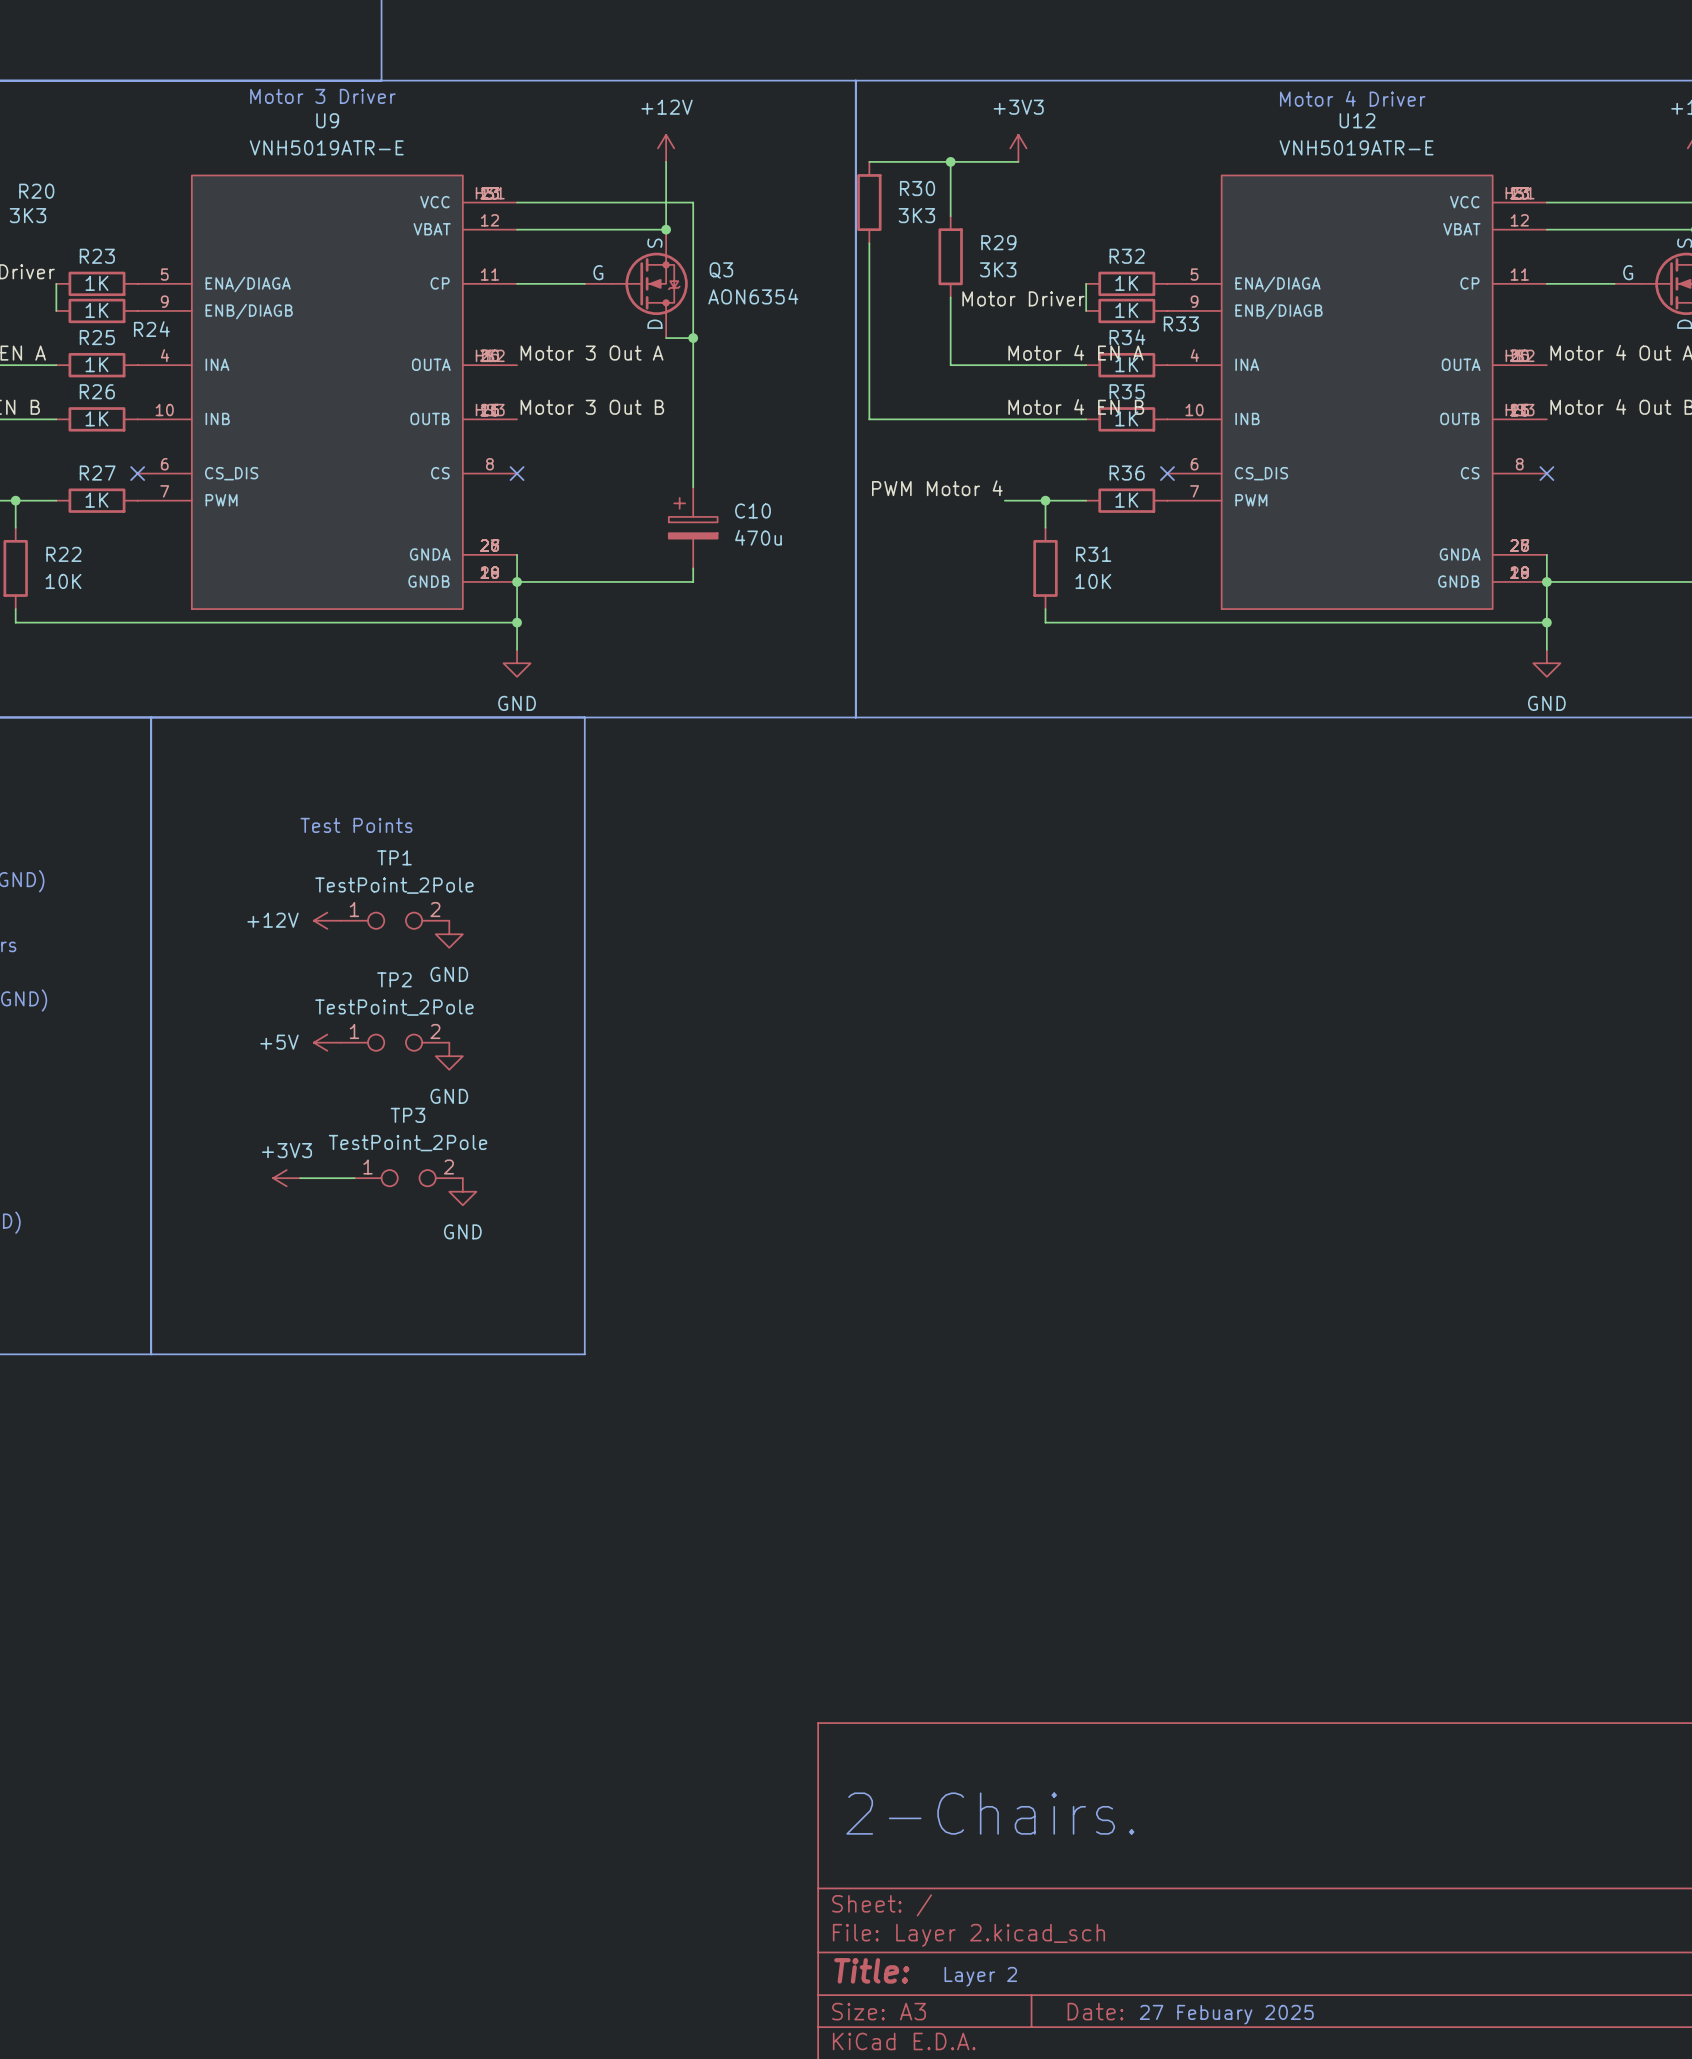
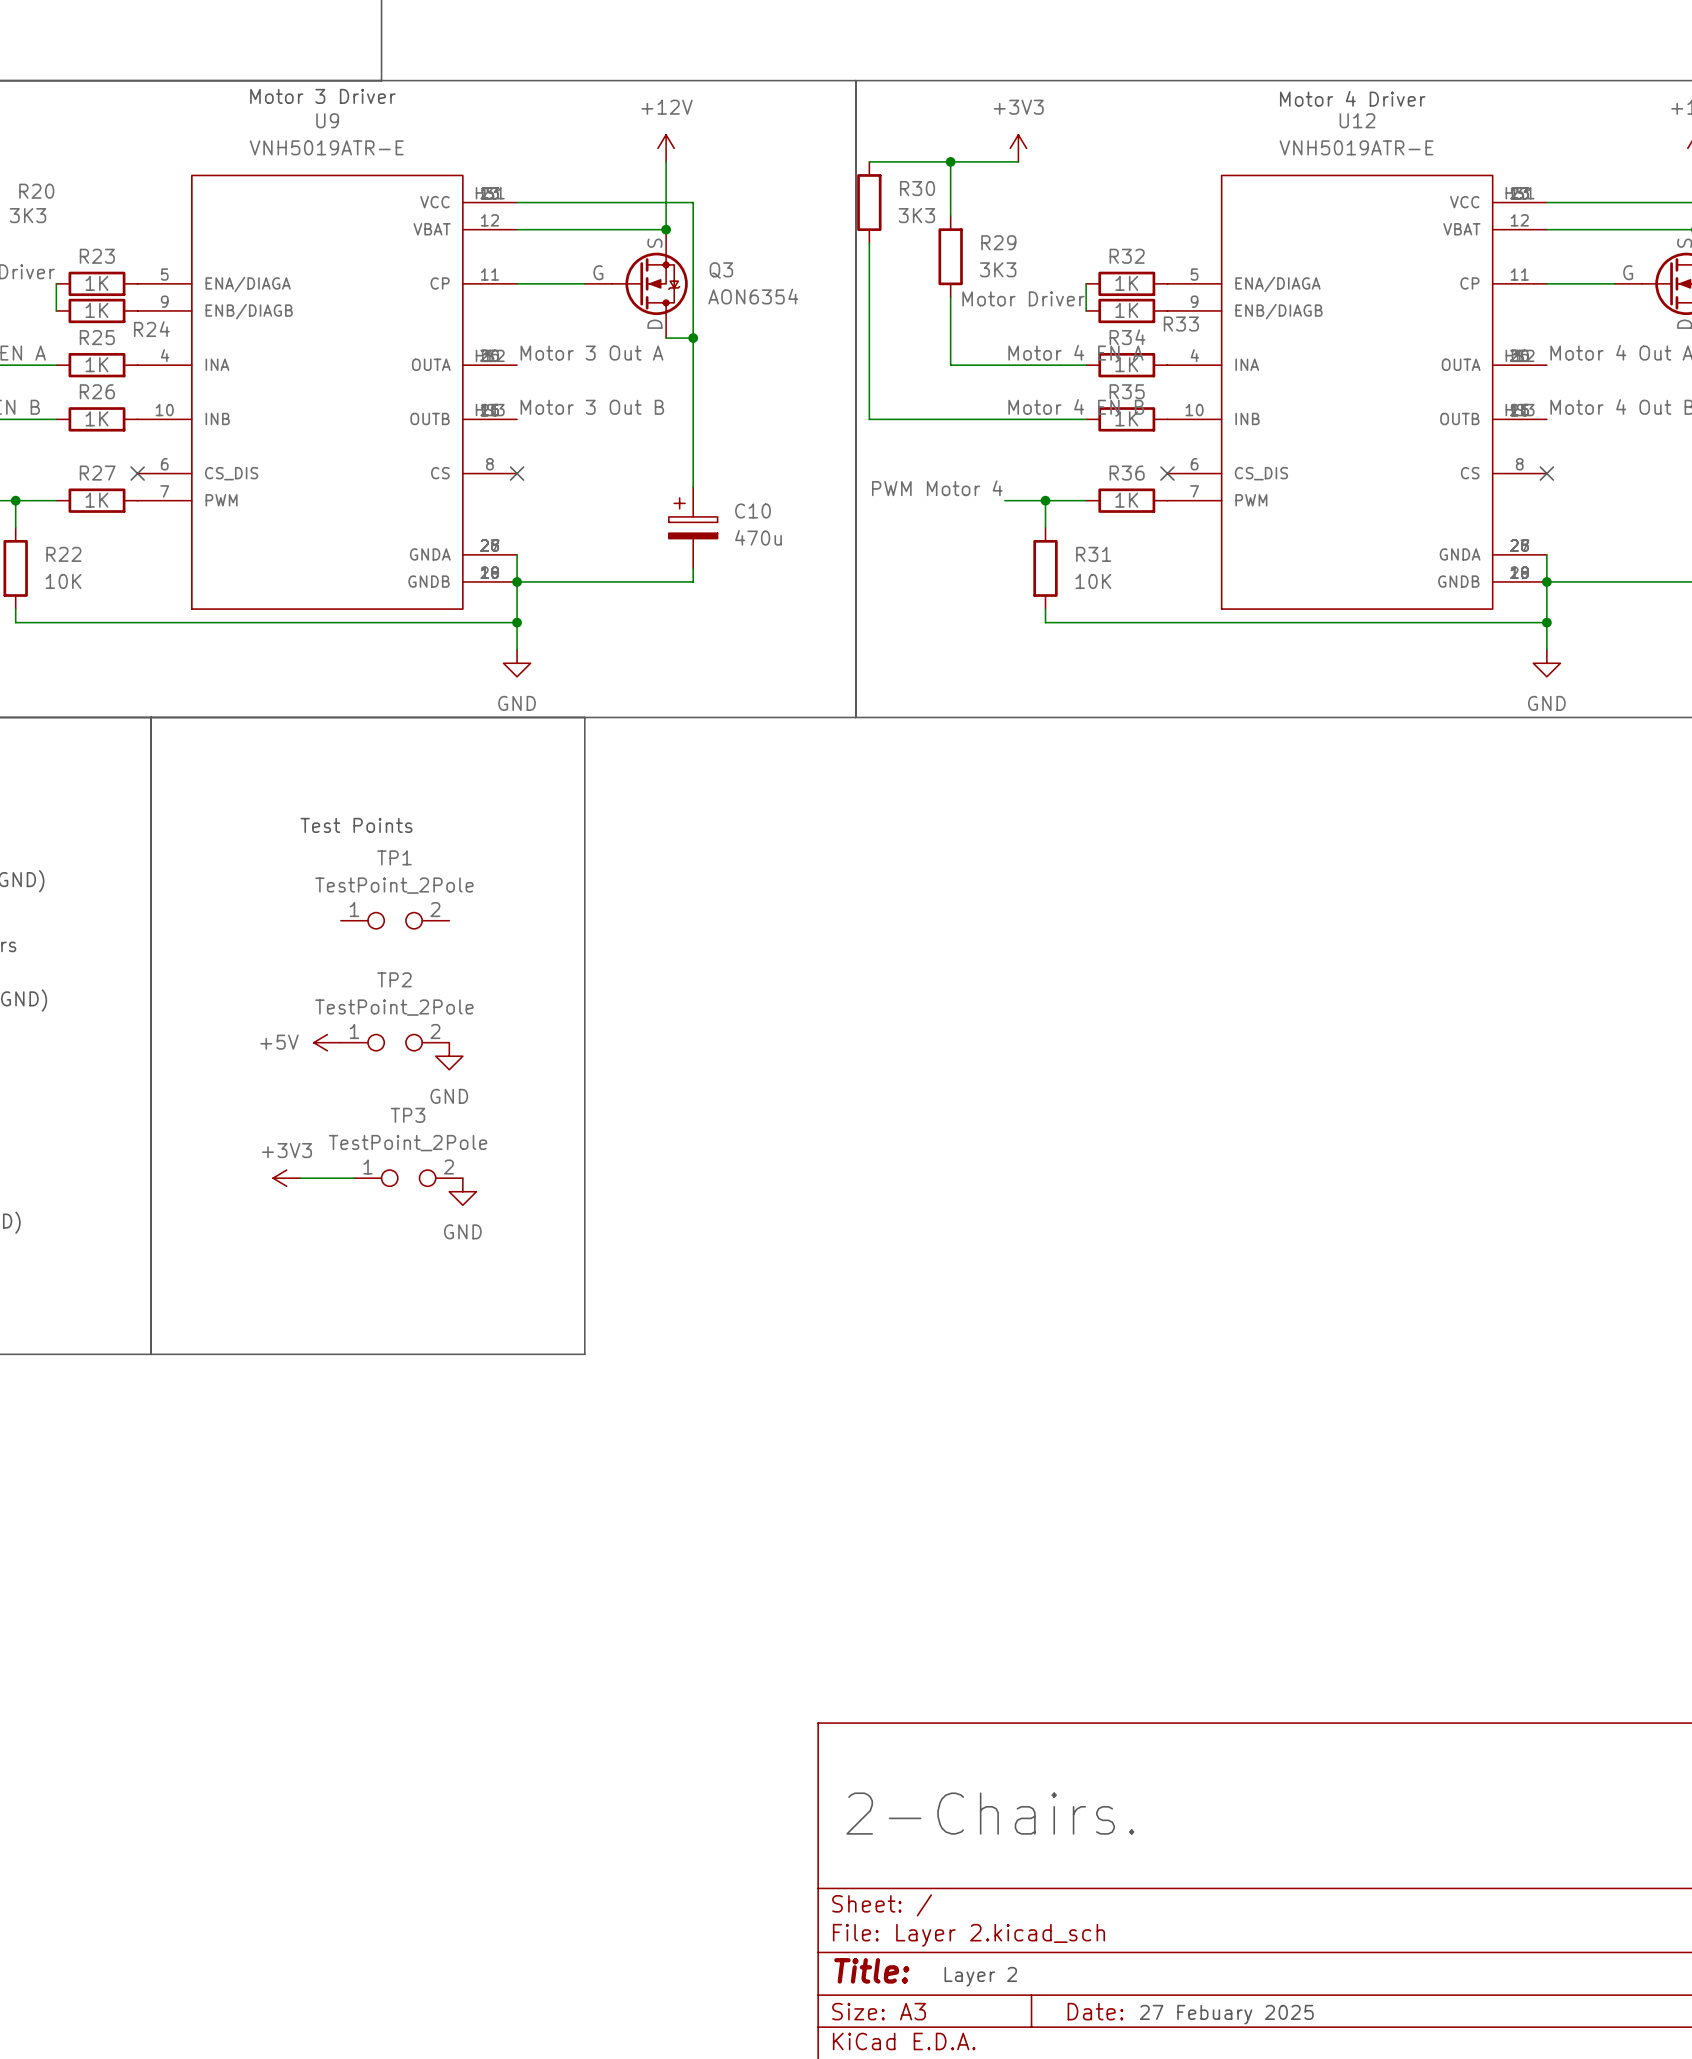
power symbol: +12V (327, 920) -> none
power symbol: GND (449, 934) -> none

